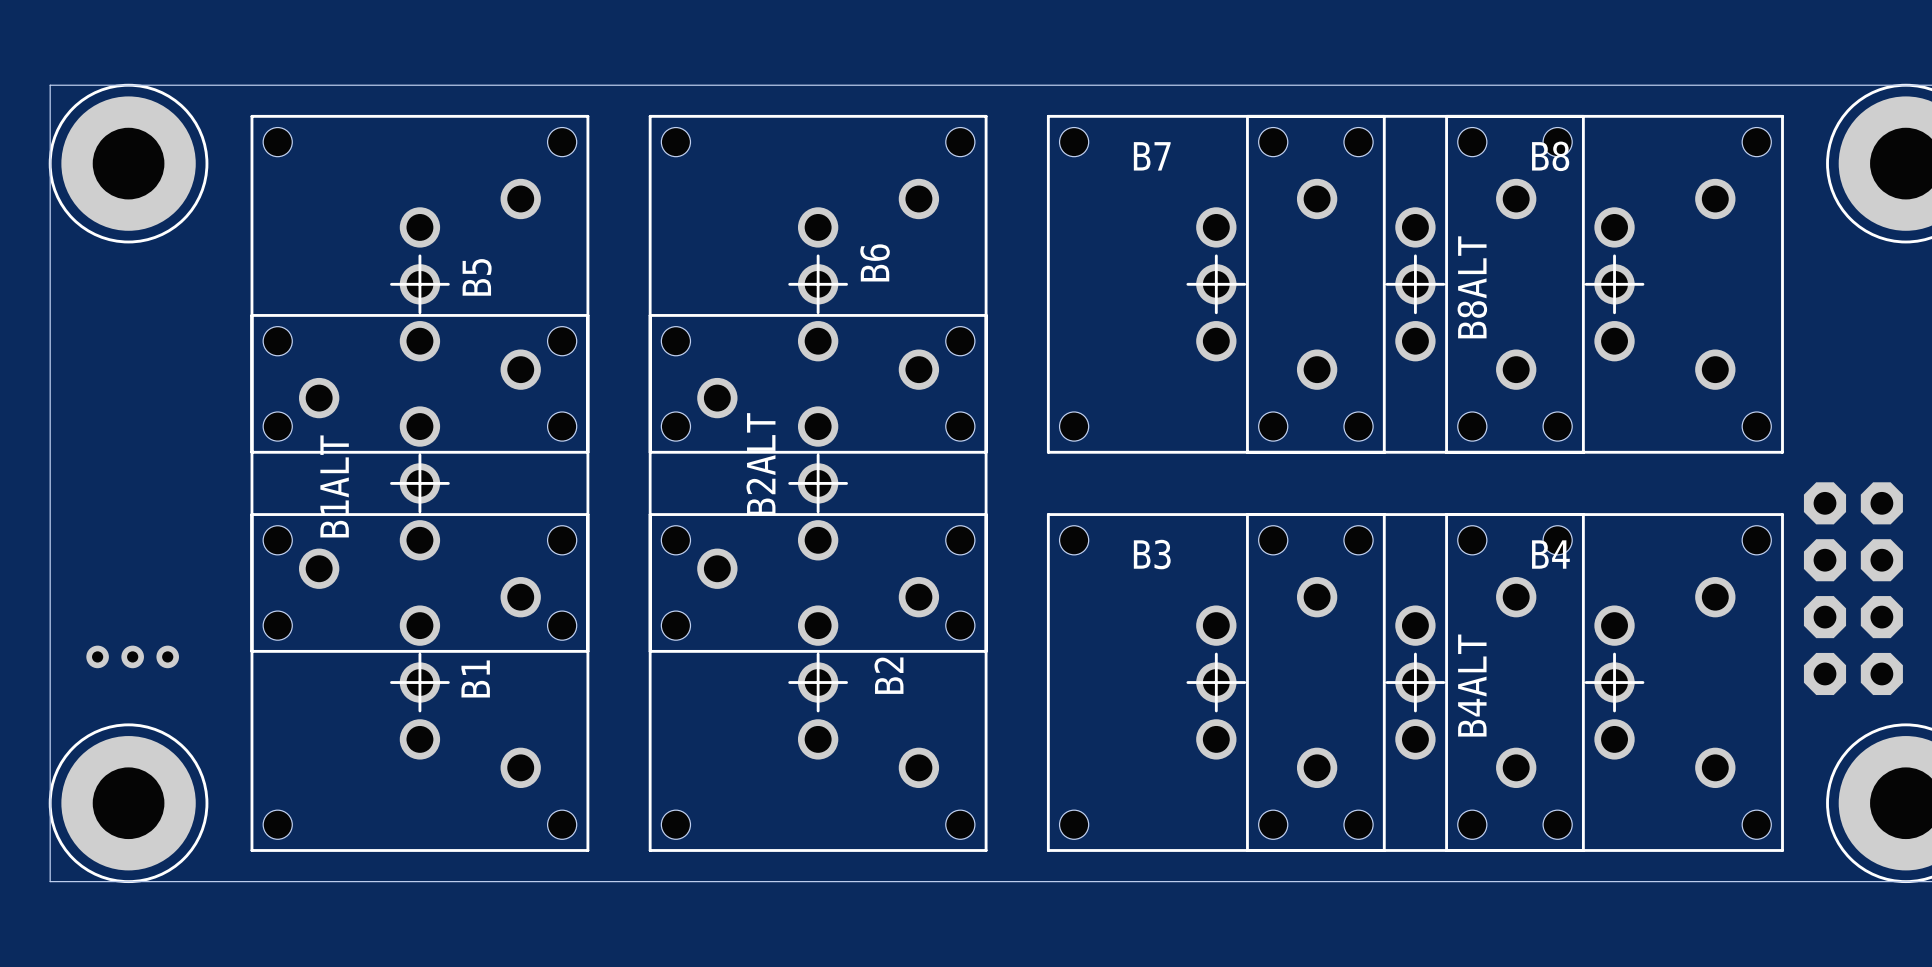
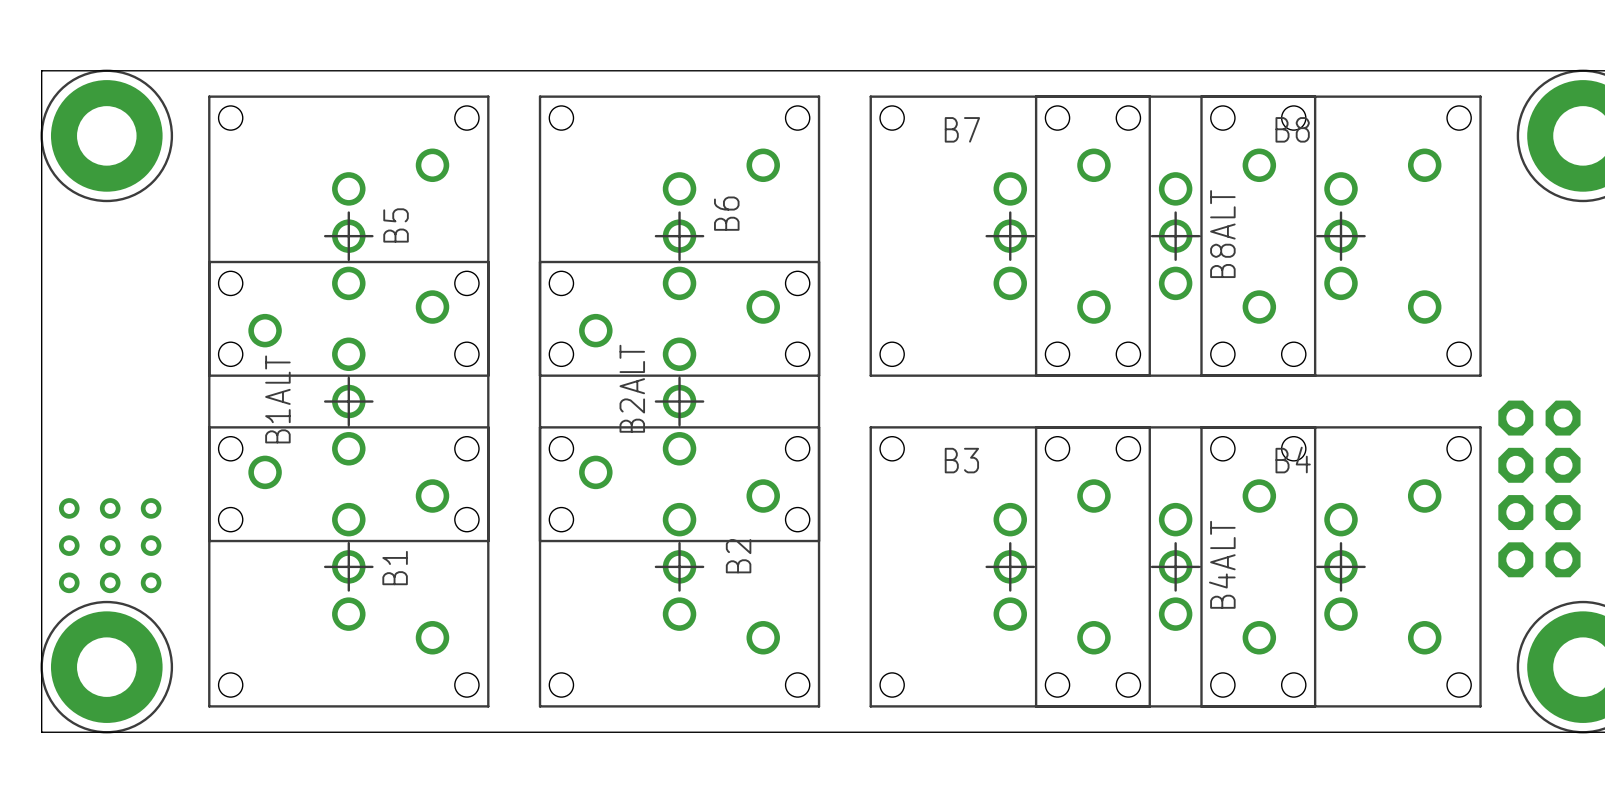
part footprint: [86, 645, 180, 669] -> [58, 498, 162, 594]

